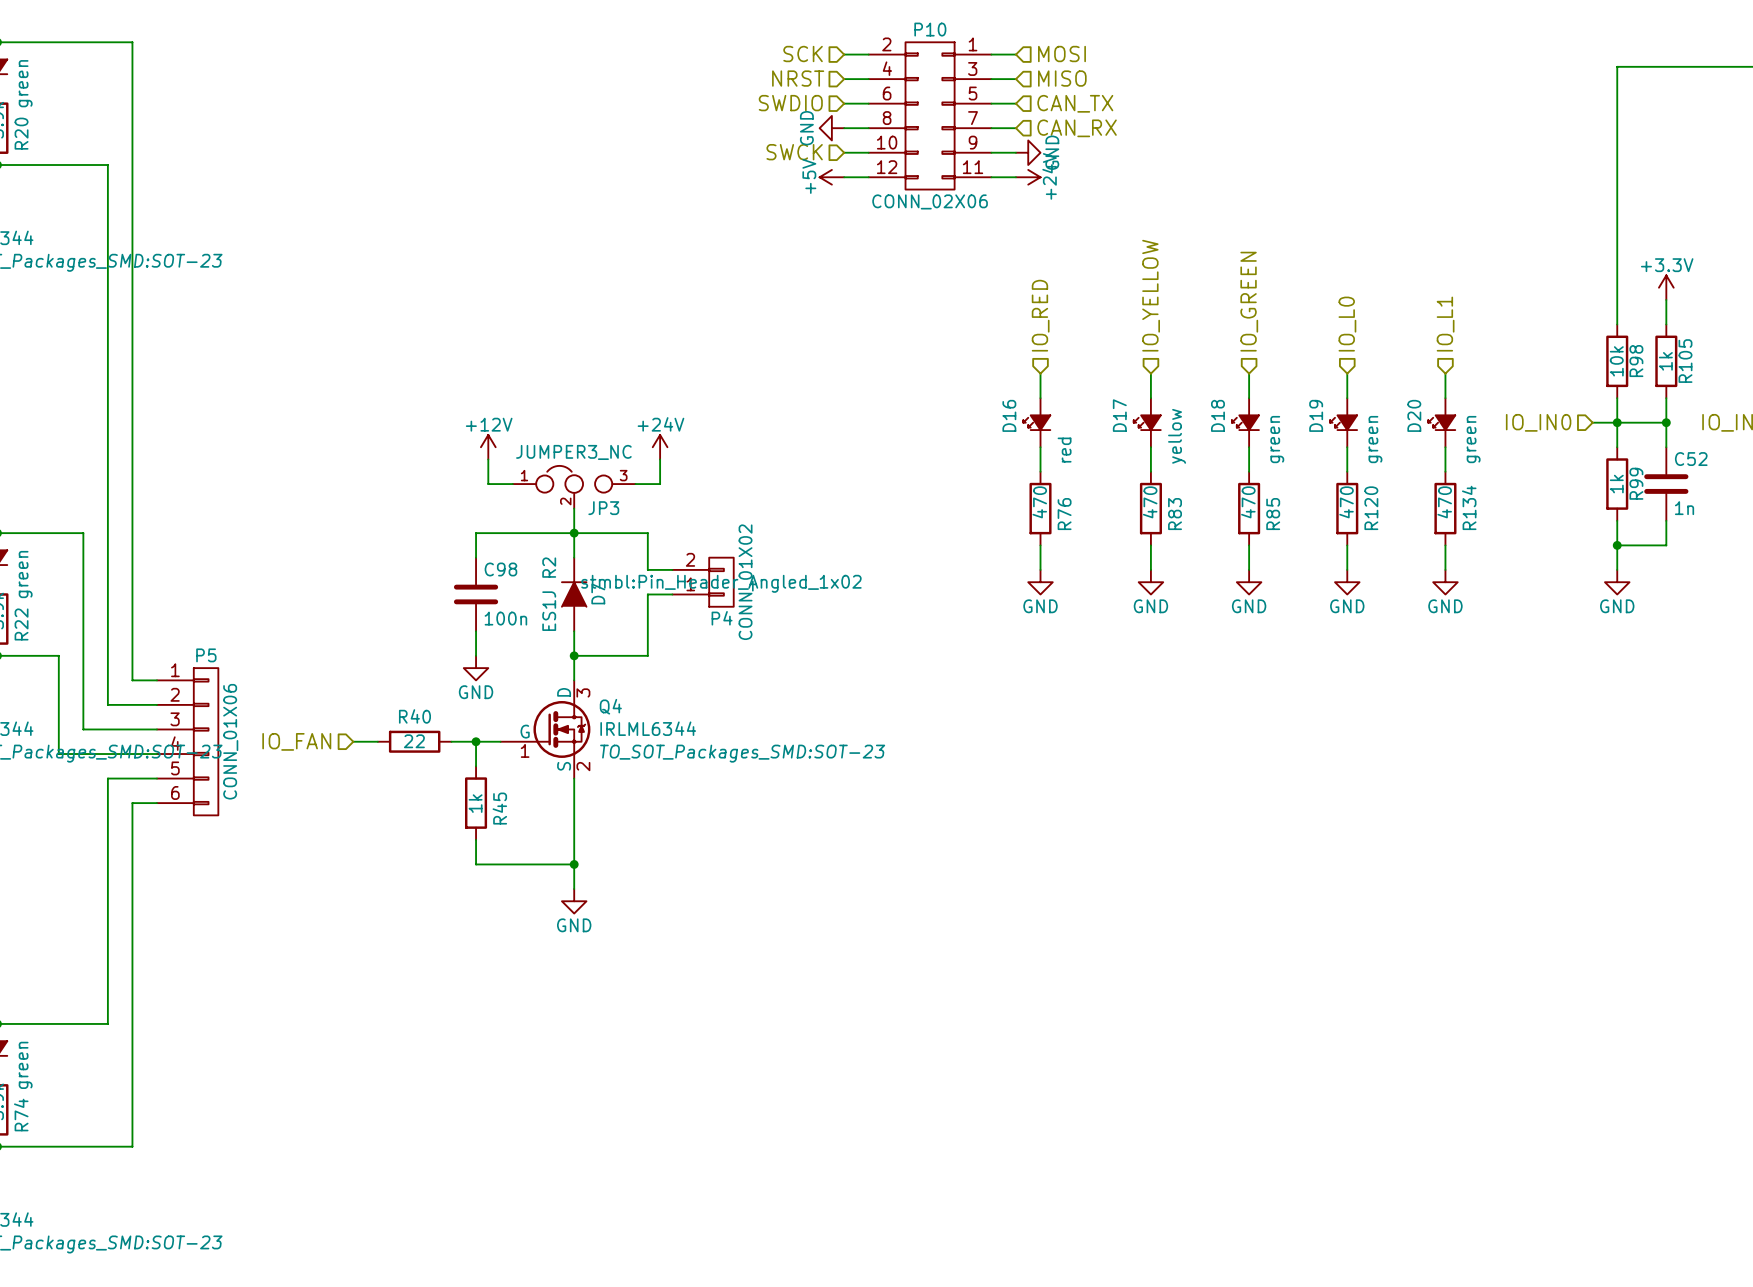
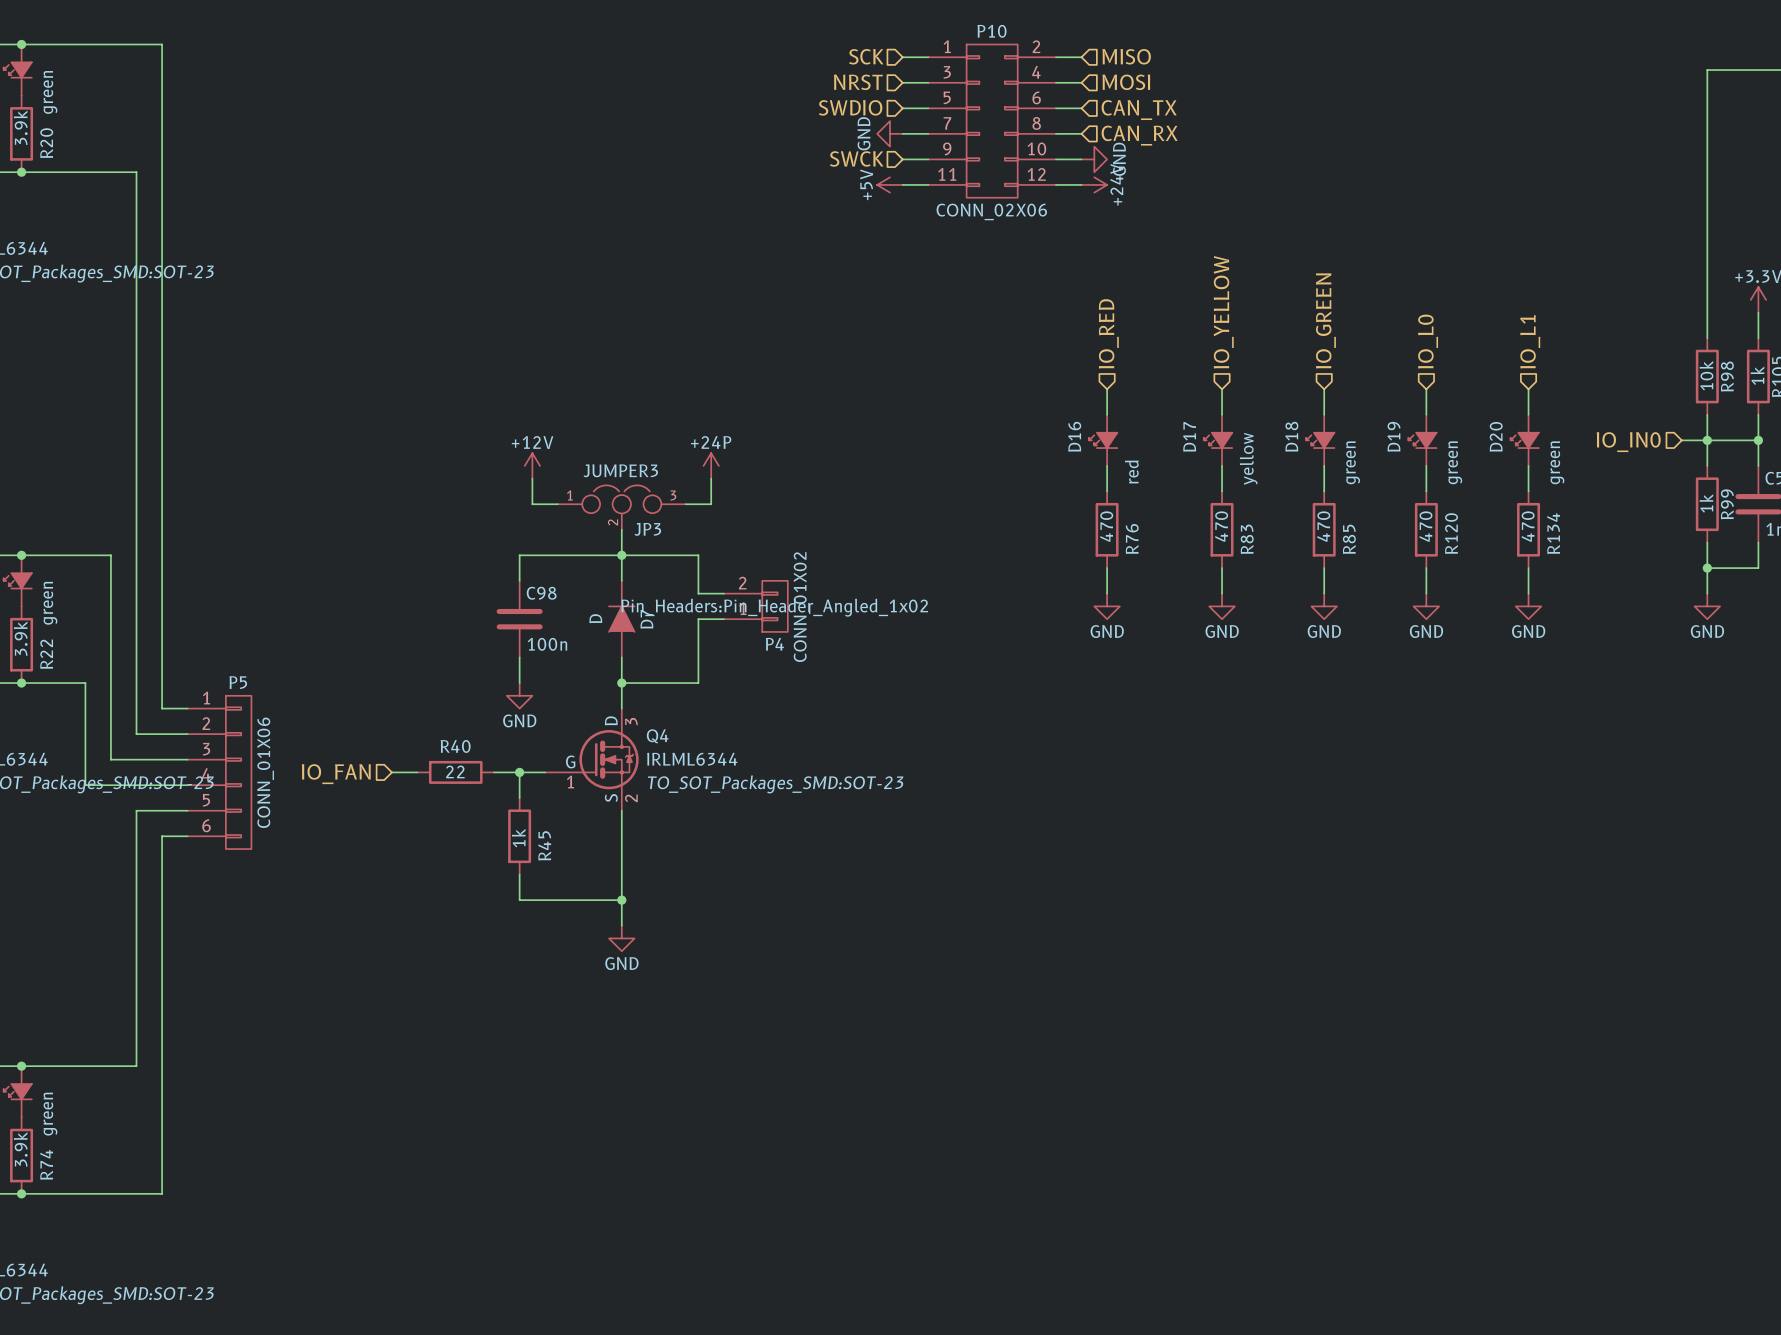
hierarchical label: MOSI (1061, 54) -> MISO (1126, 56)
hierarchical label: MISO (1062, 78) -> MOSI (1126, 82)
P10 flip: as is (930, 115) -> left-right (992, 121)
power symbol: +24V (660, 447) -> +24P (711, 465)
JP3 value: JUMPER3_NC (573, 452) -> JUMPER3 (620, 470)
JP3 symbol: [512, 465, 636, 509] -> [557, 485, 686, 530]
P4 text: stmbl:Pin_Header_Angled_1x02 (721, 583) -> Pin_Headers:Pin_Header_Angled_1x02 (774, 607)
D7 value: ES1J R2 (549, 594) -> D (595, 618)

